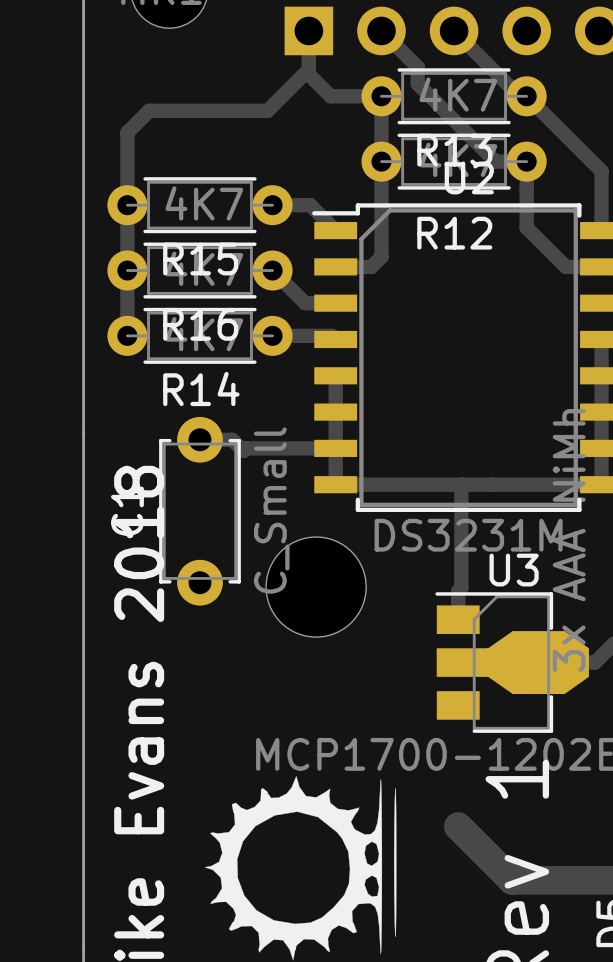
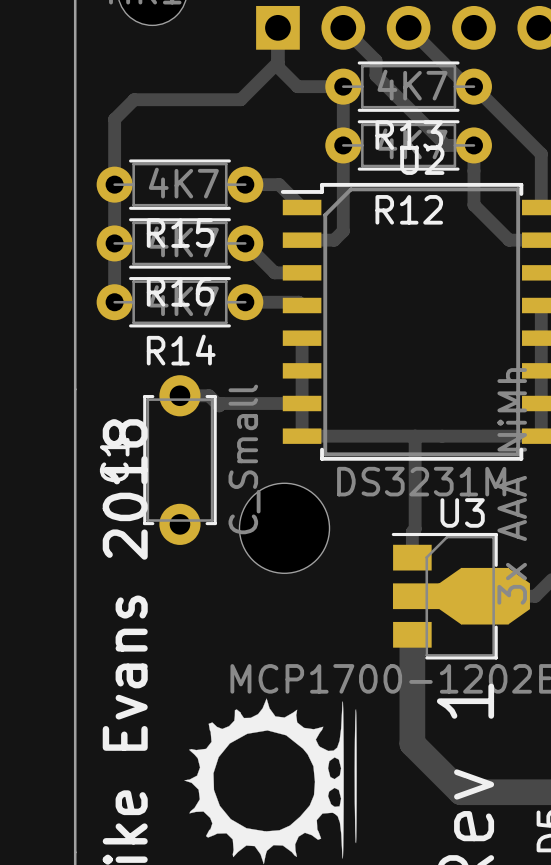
track: none -> (412, 634) (412, 743)

